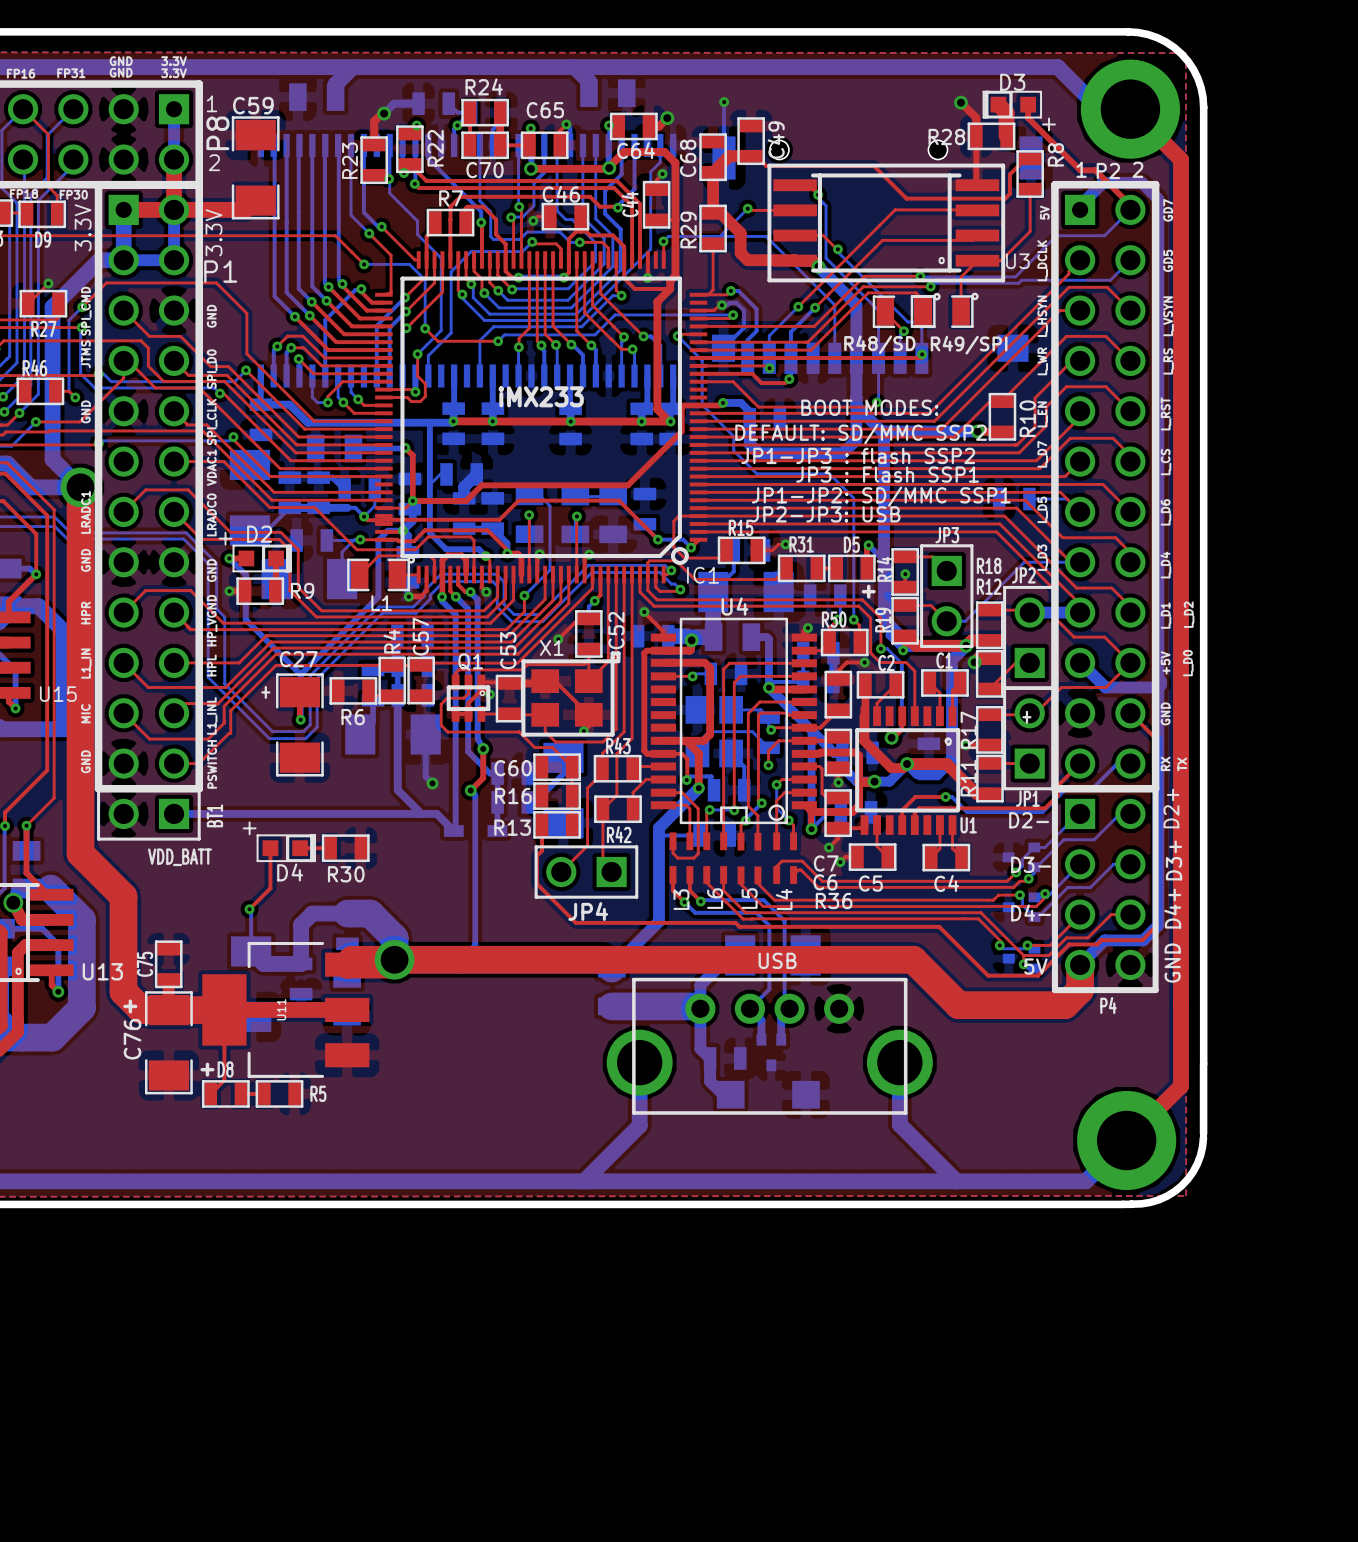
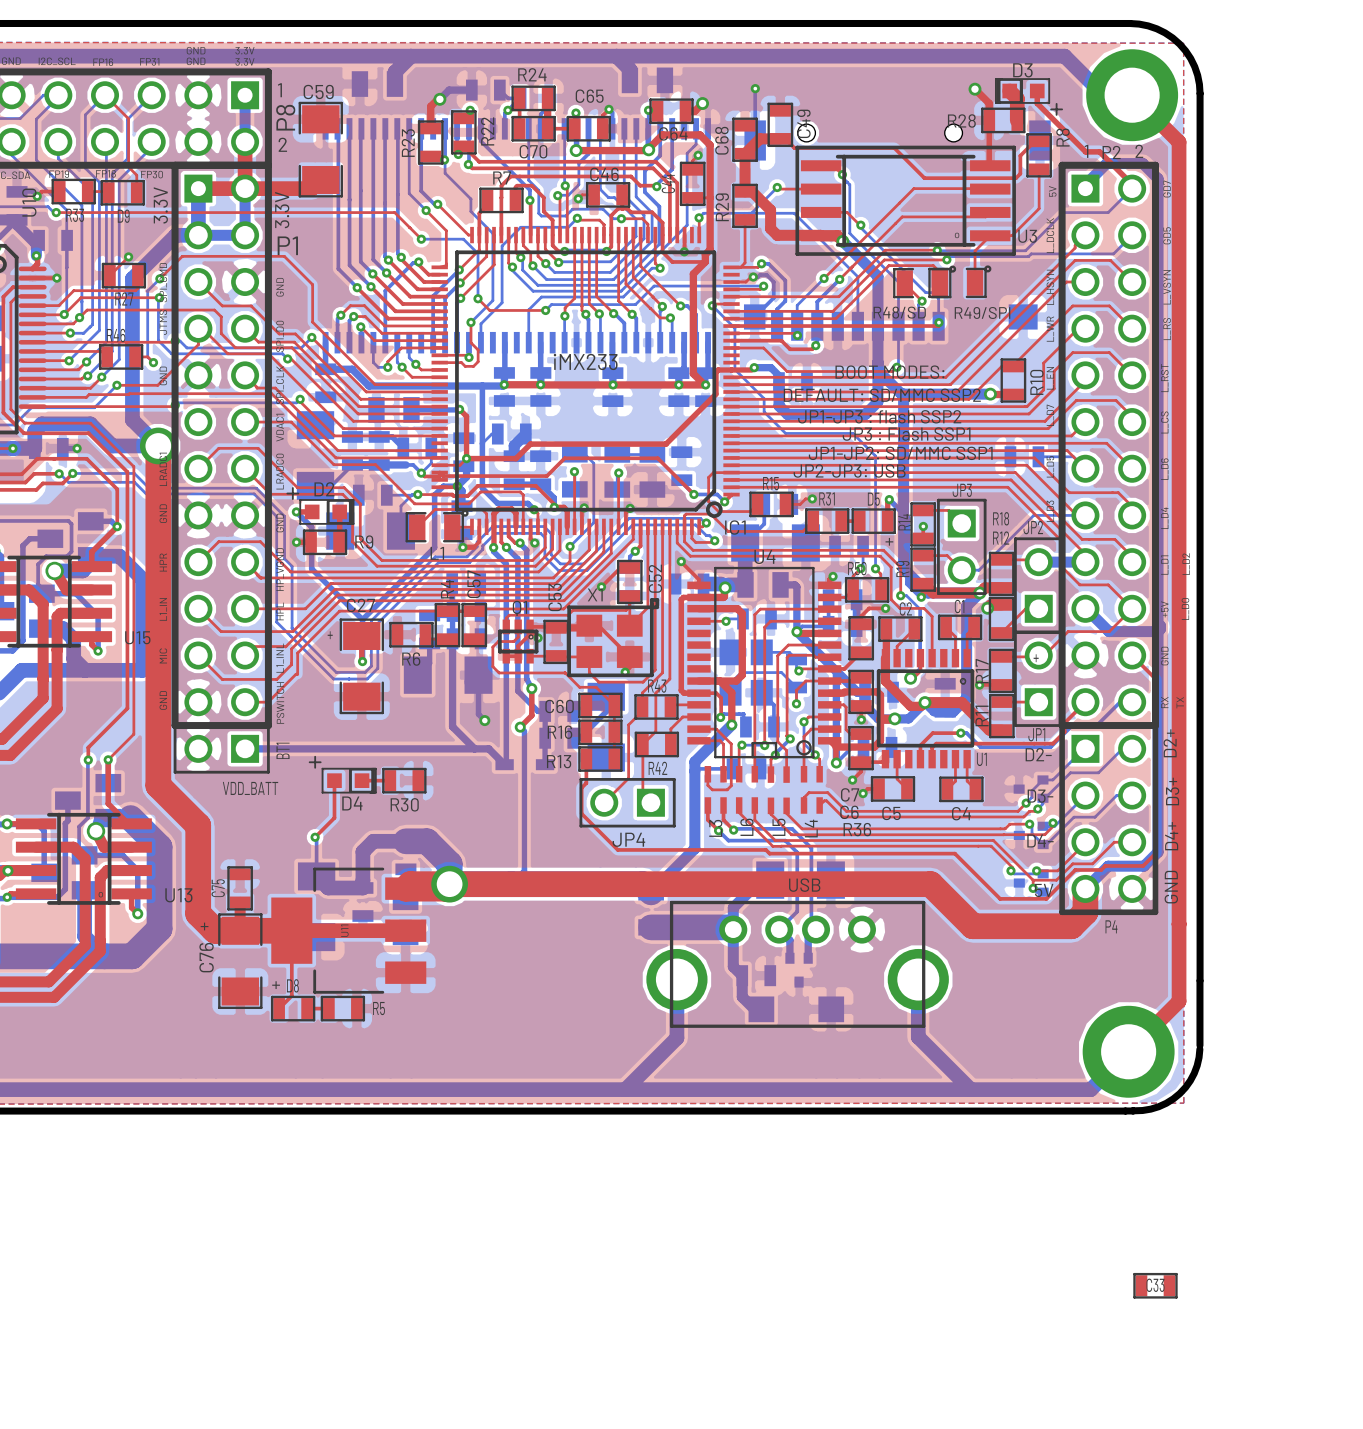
C33: none -> (1155, 1285)

